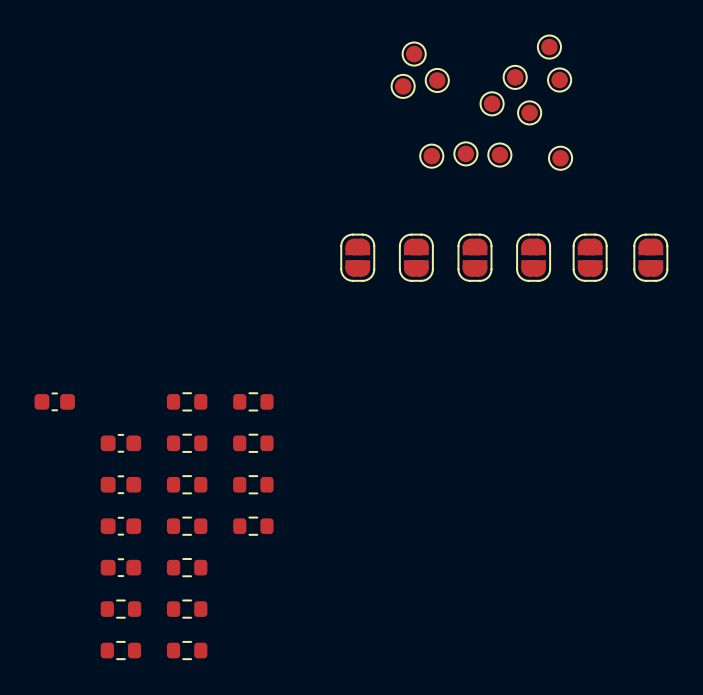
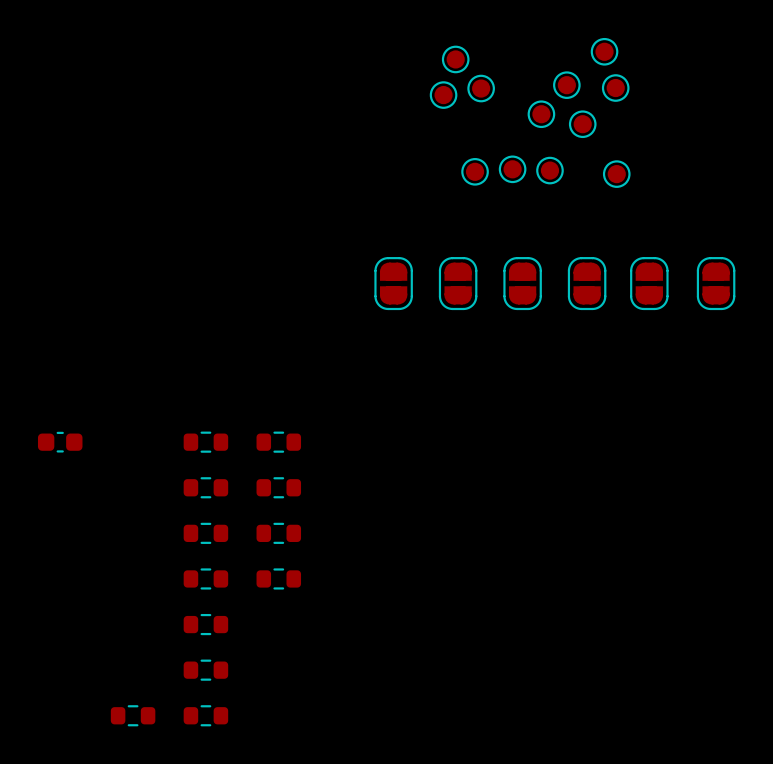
part: (120, 443) -> none
part: (120, 484) -> none
part: (120, 526) -> none
part: (120, 567) -> none
part: (120, 609) -> none

